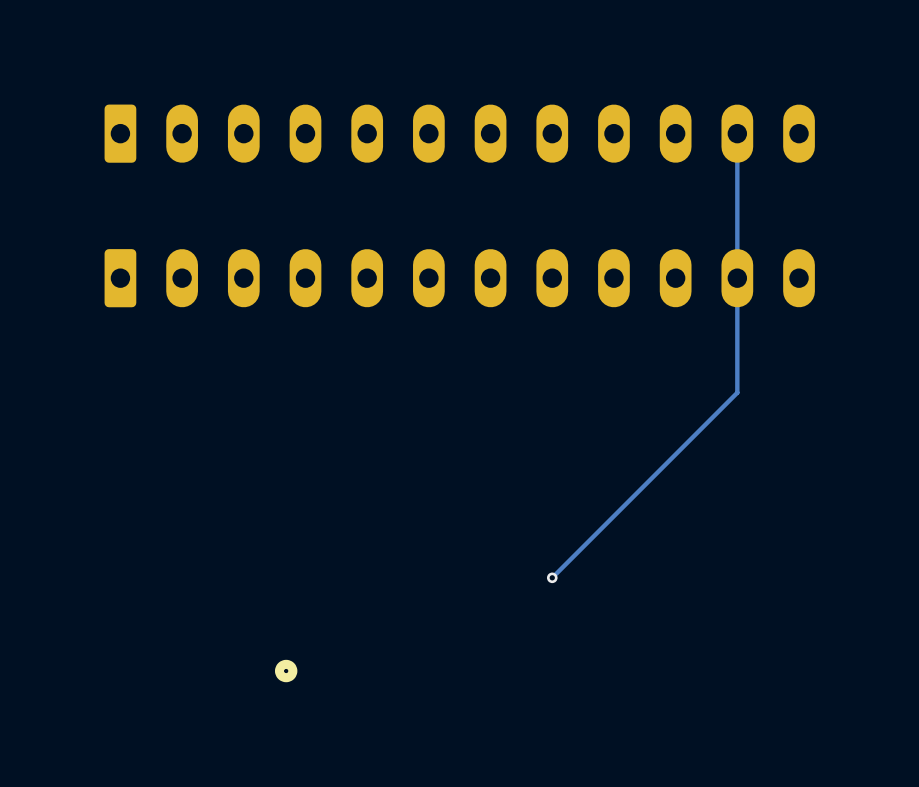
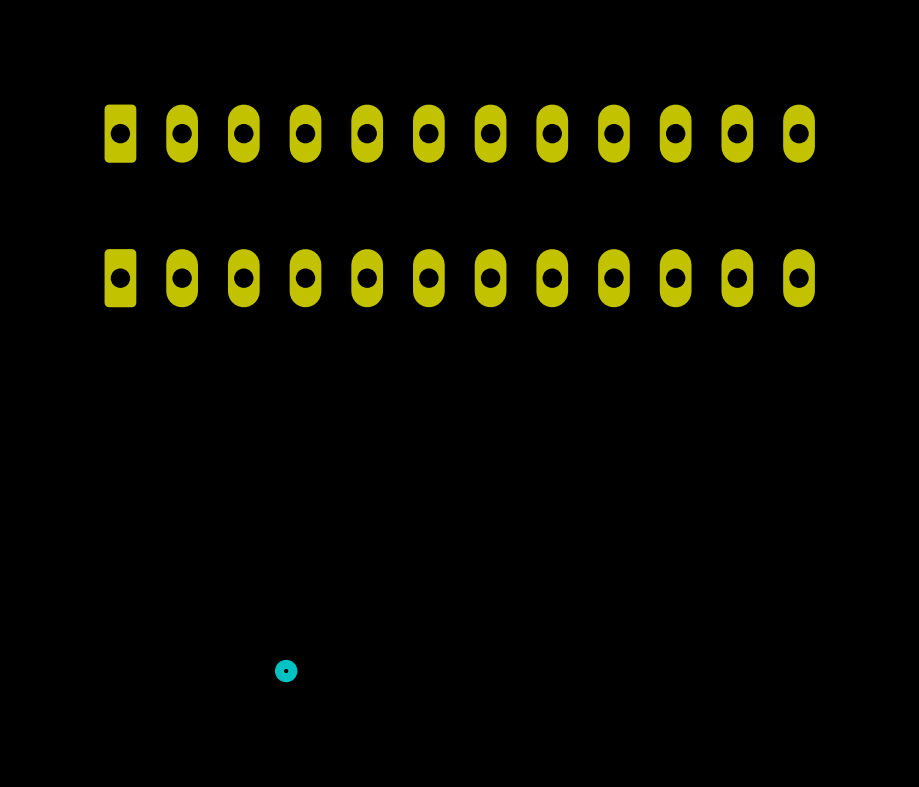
track: (737, 133) (737, 392) (552, 577) -> none
via: (552, 577) -> none

